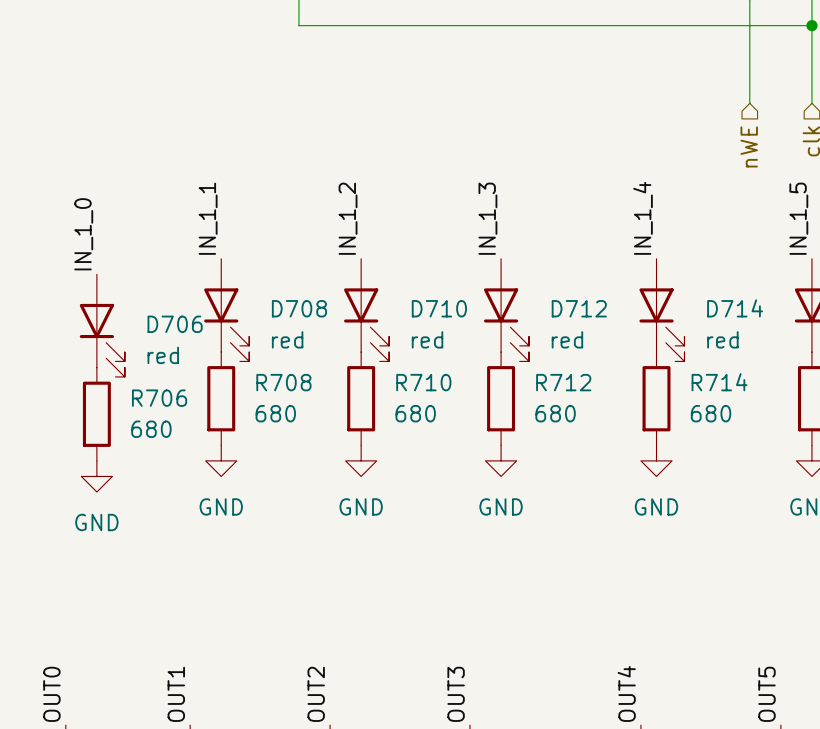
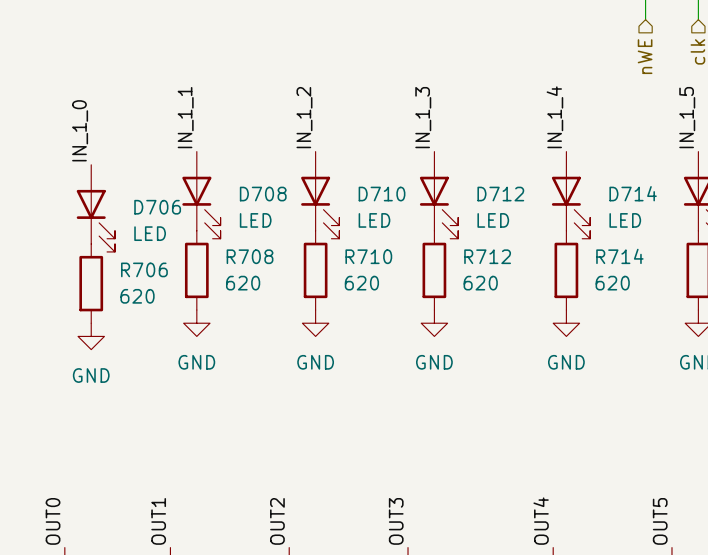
D708 value: red (287, 339) -> LED (255, 220)
D710 value: red (427, 339) -> LED (374, 220)
D712 value: red (567, 339) -> LED (493, 220)
D714 value: red (722, 339) -> LED (625, 220)
D706 value: red (163, 355) -> LED (150, 233)
R708 value: 680 (275, 413) -> 620 (243, 283)
R710 value: 680 (415, 413) -> 620 (361, 283)
R712 value: 680 (555, 413) -> 620 (480, 283)
R714 value: 680 (711, 413) -> 620 (612, 283)
R706 value: 680 (151, 429) -> 620 (137, 296)

